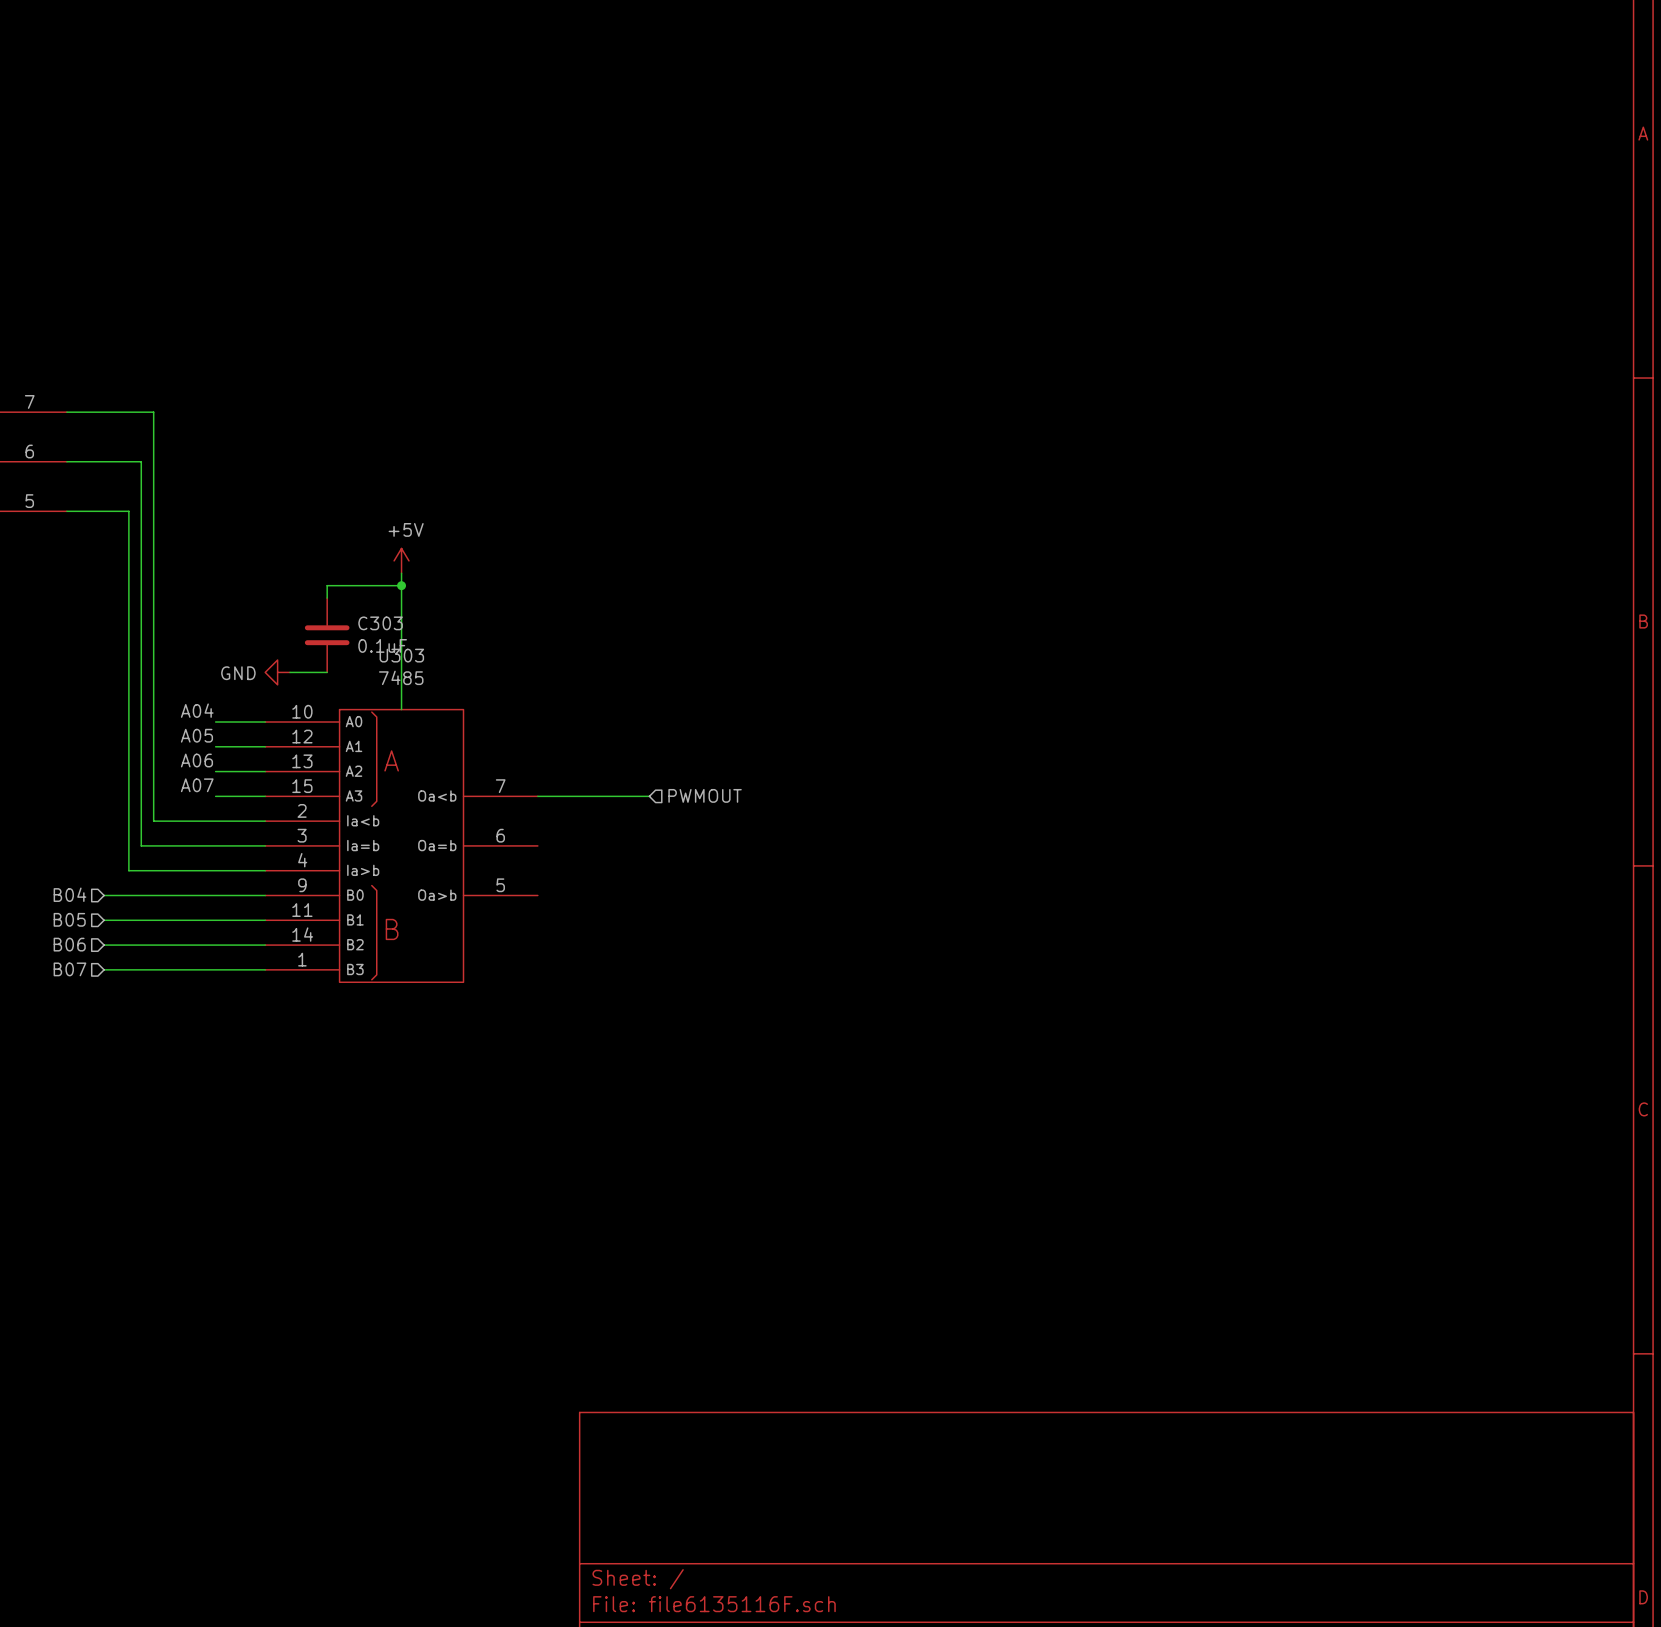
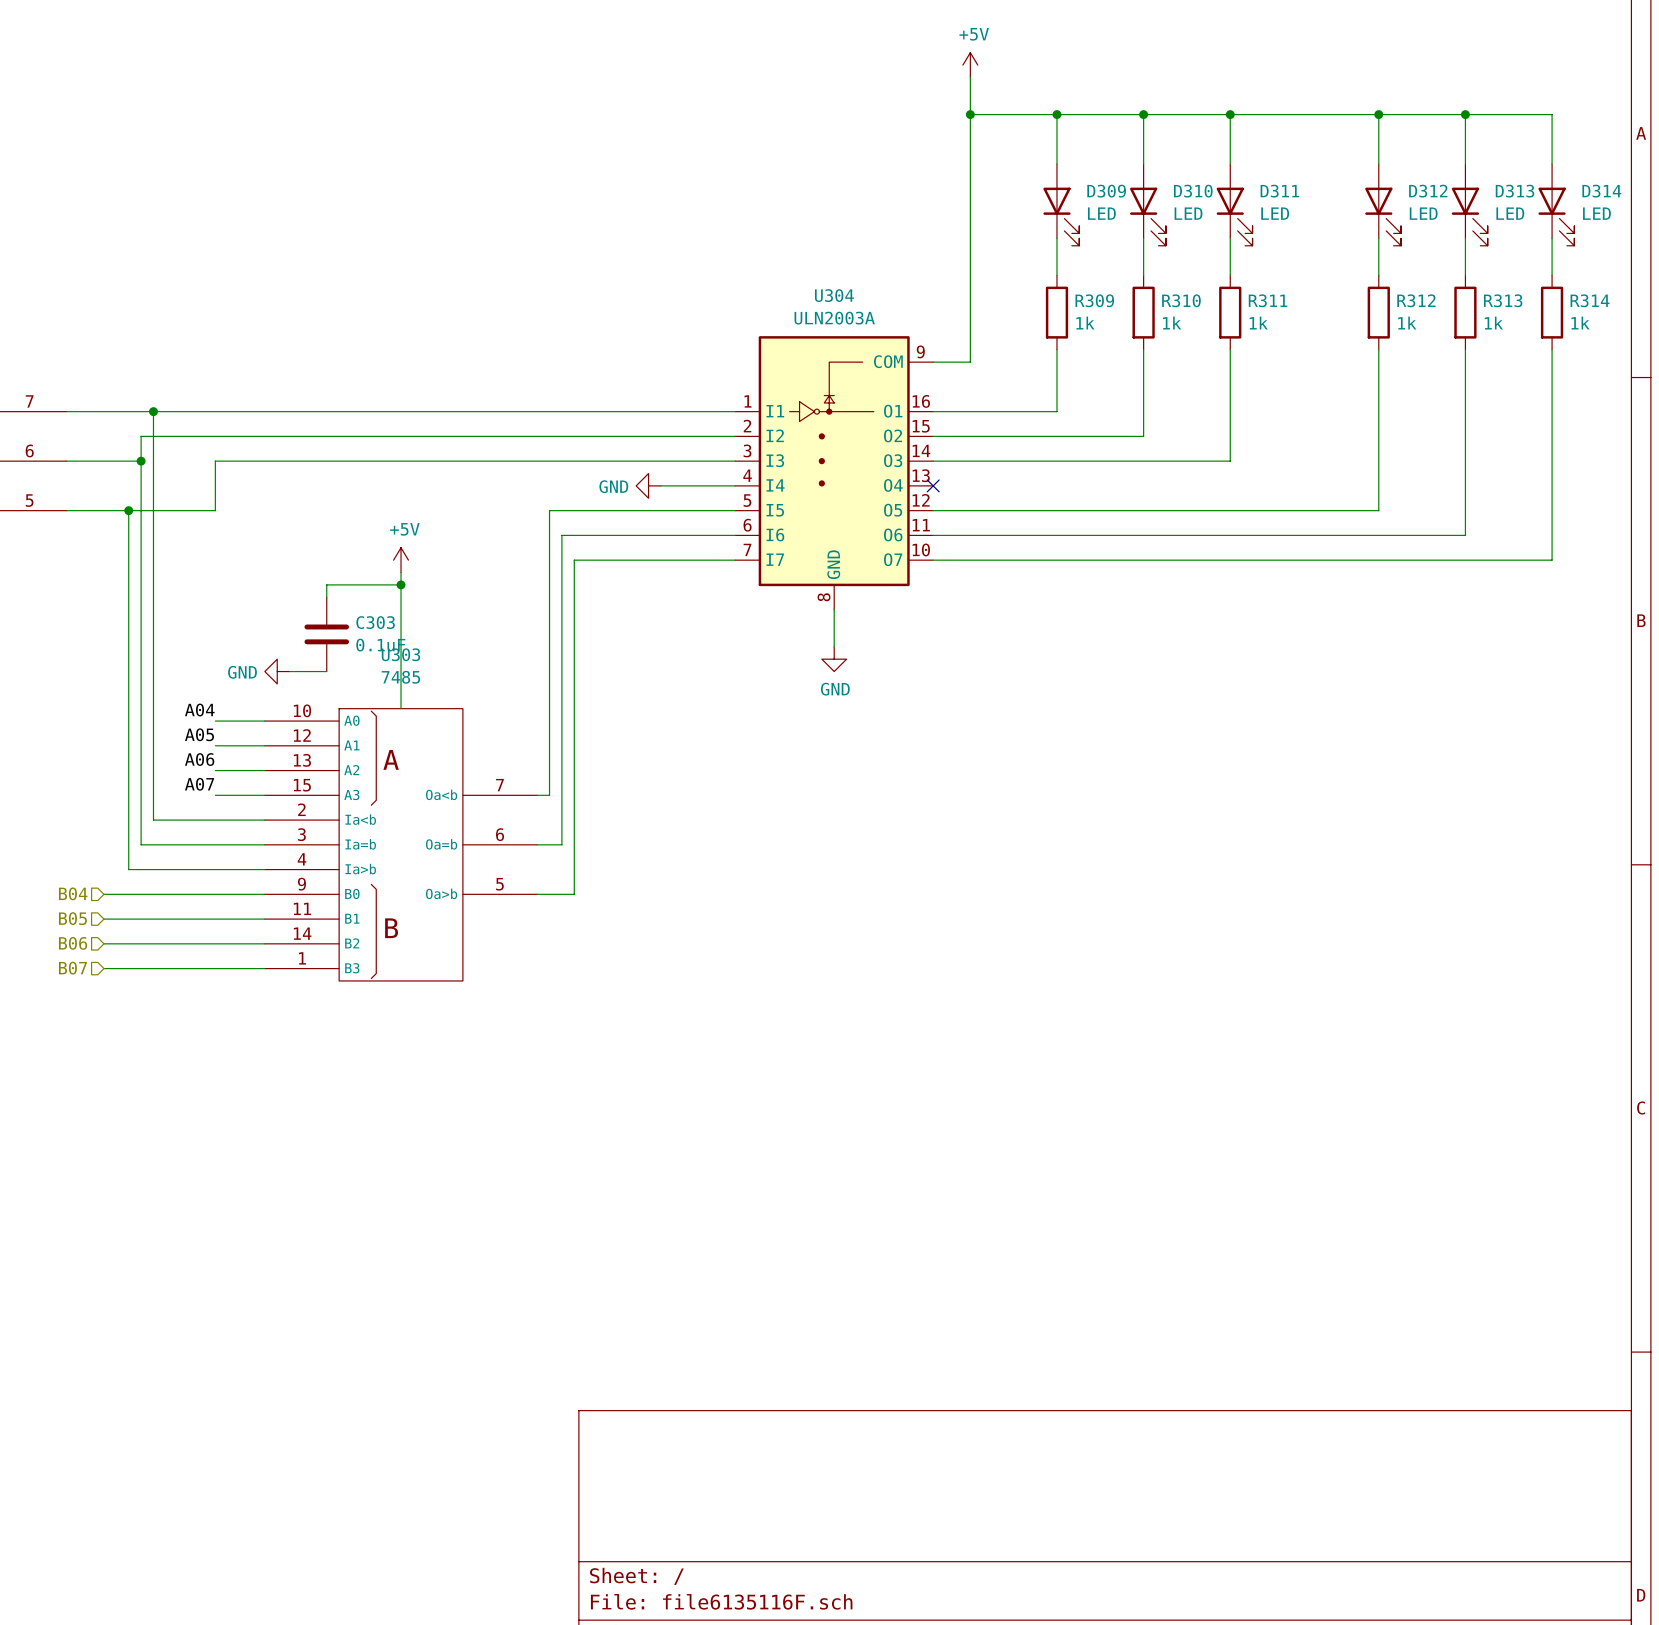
power symbol: none -> +5V (970, 65)
wire: none -> (970, 77) (970, 362) (933, 362)
wire: none -> (970, 114) (1552, 114) (1552, 164)
junction: none -> (970, 114)
wire: none -> (1056, 114) (1056, 164)
junction: none -> (1056, 114)
wire: none -> (1143, 114) (1143, 164)
junction: none -> (1143, 114)
wire: none -> (1230, 114) (1230, 164)
junction: none -> (1230, 114)
wire: none -> (1378, 114) (1378, 164)
junction: none -> (1378, 114)
wire: none -> (1465, 114) (1465, 164)
junction: none -> (1465, 114)
D309: none -> LED (1061, 204)
D310: none -> LED (1147, 204)
D311: none -> LED (1234, 204)
D312: none -> LED (1383, 204)
D313: none -> LED (1469, 204)
D314: none -> LED (1556, 204)
wire: none -> (1056, 238) (1056, 275)
wire: none -> (1143, 238) (1143, 275)
wire: none -> (1230, 238) (1230, 275)
wire: none -> (1378, 238) (1378, 275)
wire: none -> (1465, 238) (1465, 275)
wire: none -> (1552, 238) (1552, 275)
R309: none -> 1k (1056, 312)
R310: none -> 1k (1143, 312)
R311: none -> 1k (1230, 312)
R312: none -> 1k (1378, 312)
R313: none -> 1k (1465, 312)
R314: none -> 1k (1552, 312)
wire: none -> (1056, 349) (1056, 411) (933, 411)
wire: none -> (1143, 349) (1143, 436) (933, 436)
wire: none -> (1230, 349) (1230, 461) (933, 461)
wire: none -> (1378, 349) (1378, 510) (933, 510)
wire: none -> (1465, 349) (1465, 535) (933, 535)
wire: none -> (1552, 349) (1552, 560) (933, 560)
wire: none -> (153, 411) (735, 411)
junction: none -> (153, 411)
wire: none -> (735, 436) (141, 436) (141, 461)
junction: none -> (141, 461)
wire: none -> (735, 461) (215, 461) (215, 510) (128, 510)
U304: none -> ULN2003A (834, 472)
power symbol: none -> GND (648, 485)
wire: none -> (660, 485) (735, 485)
no-connect mark: none -> (933, 485)
junction: none -> (128, 510)
wire: none -> (735, 535) (561, 535) (561, 844) (537, 844)
wire: none -> (735, 560) (574, 560) (574, 894) (537, 894)
wire: none -> (834, 609) (834, 646)
power symbol: none -> GND (834, 659)
hierarchical label: PWMOUT (705, 795) -> none
wire: (550, 796) (649, 796) -> (549, 795) (549, 510) (735, 510)

